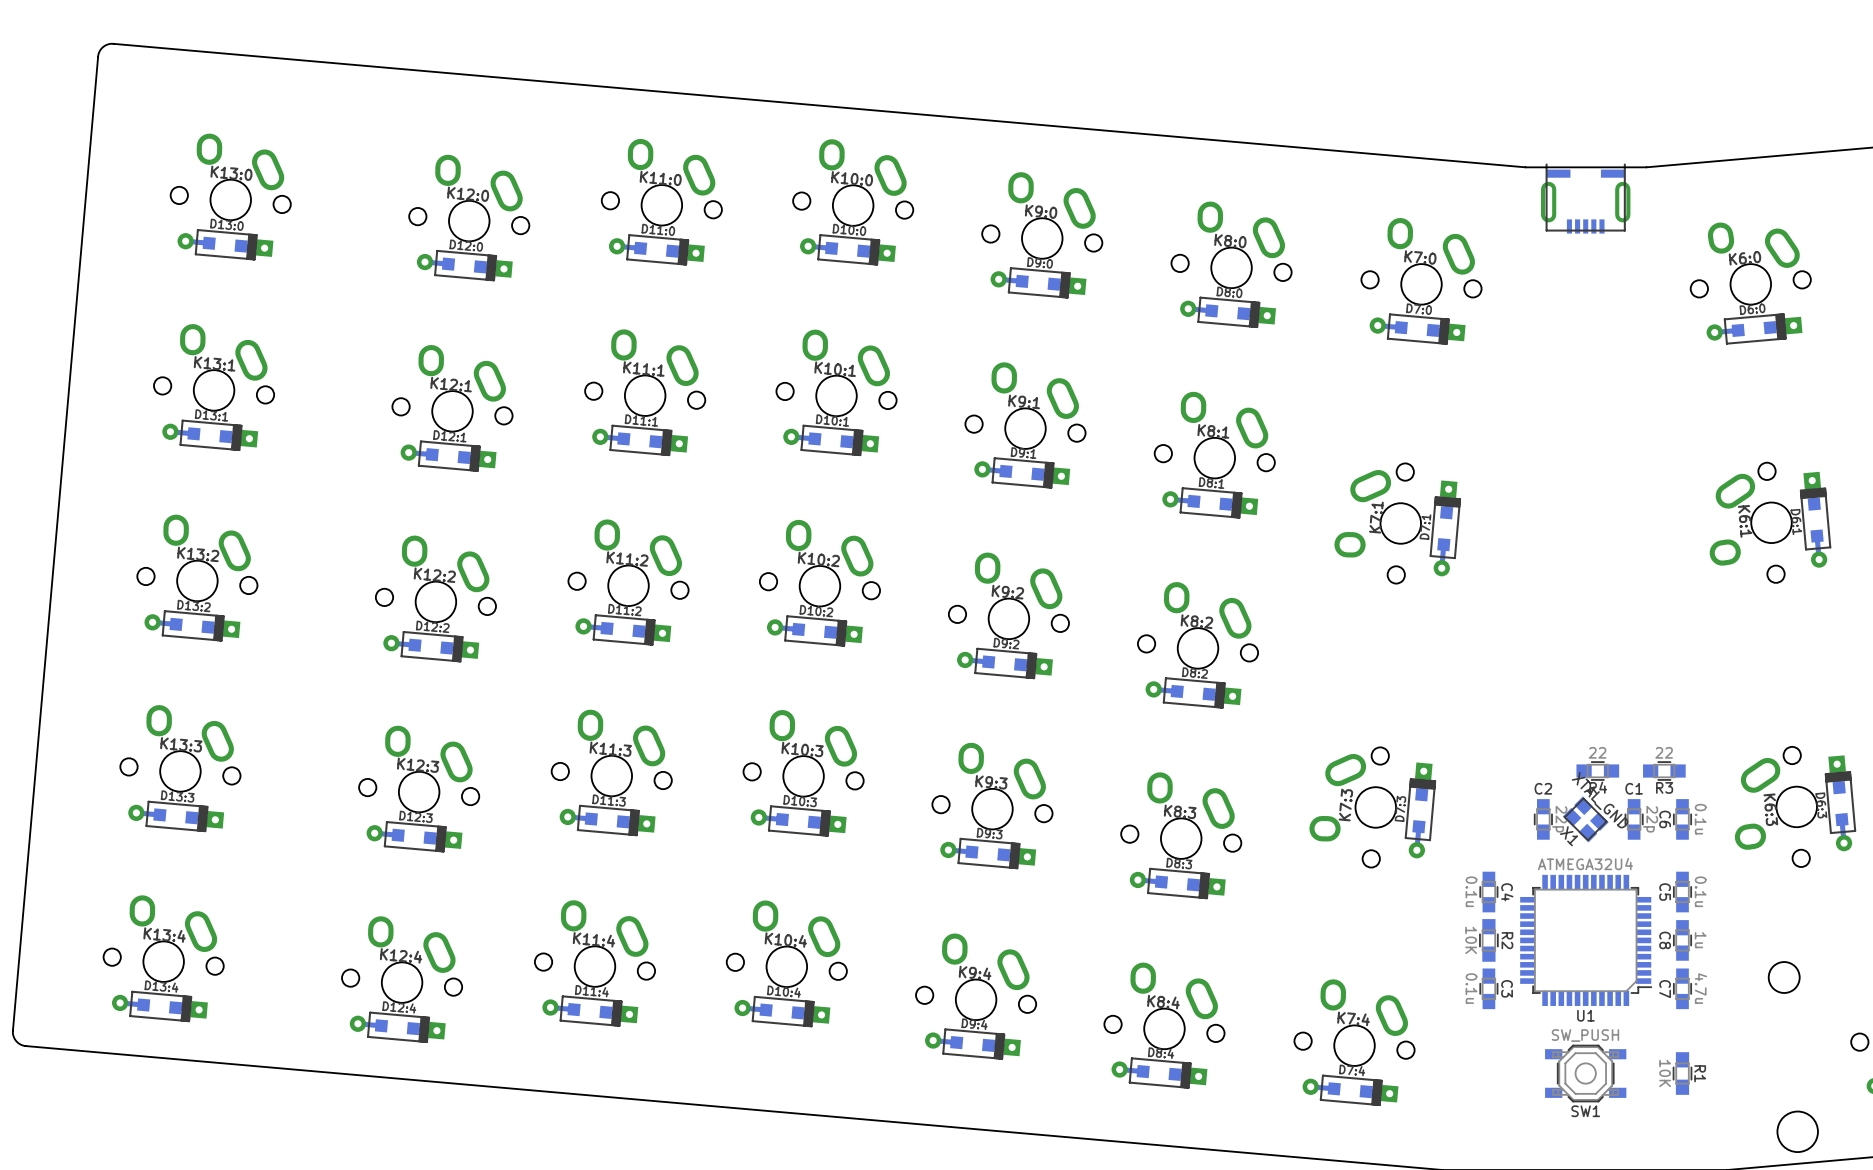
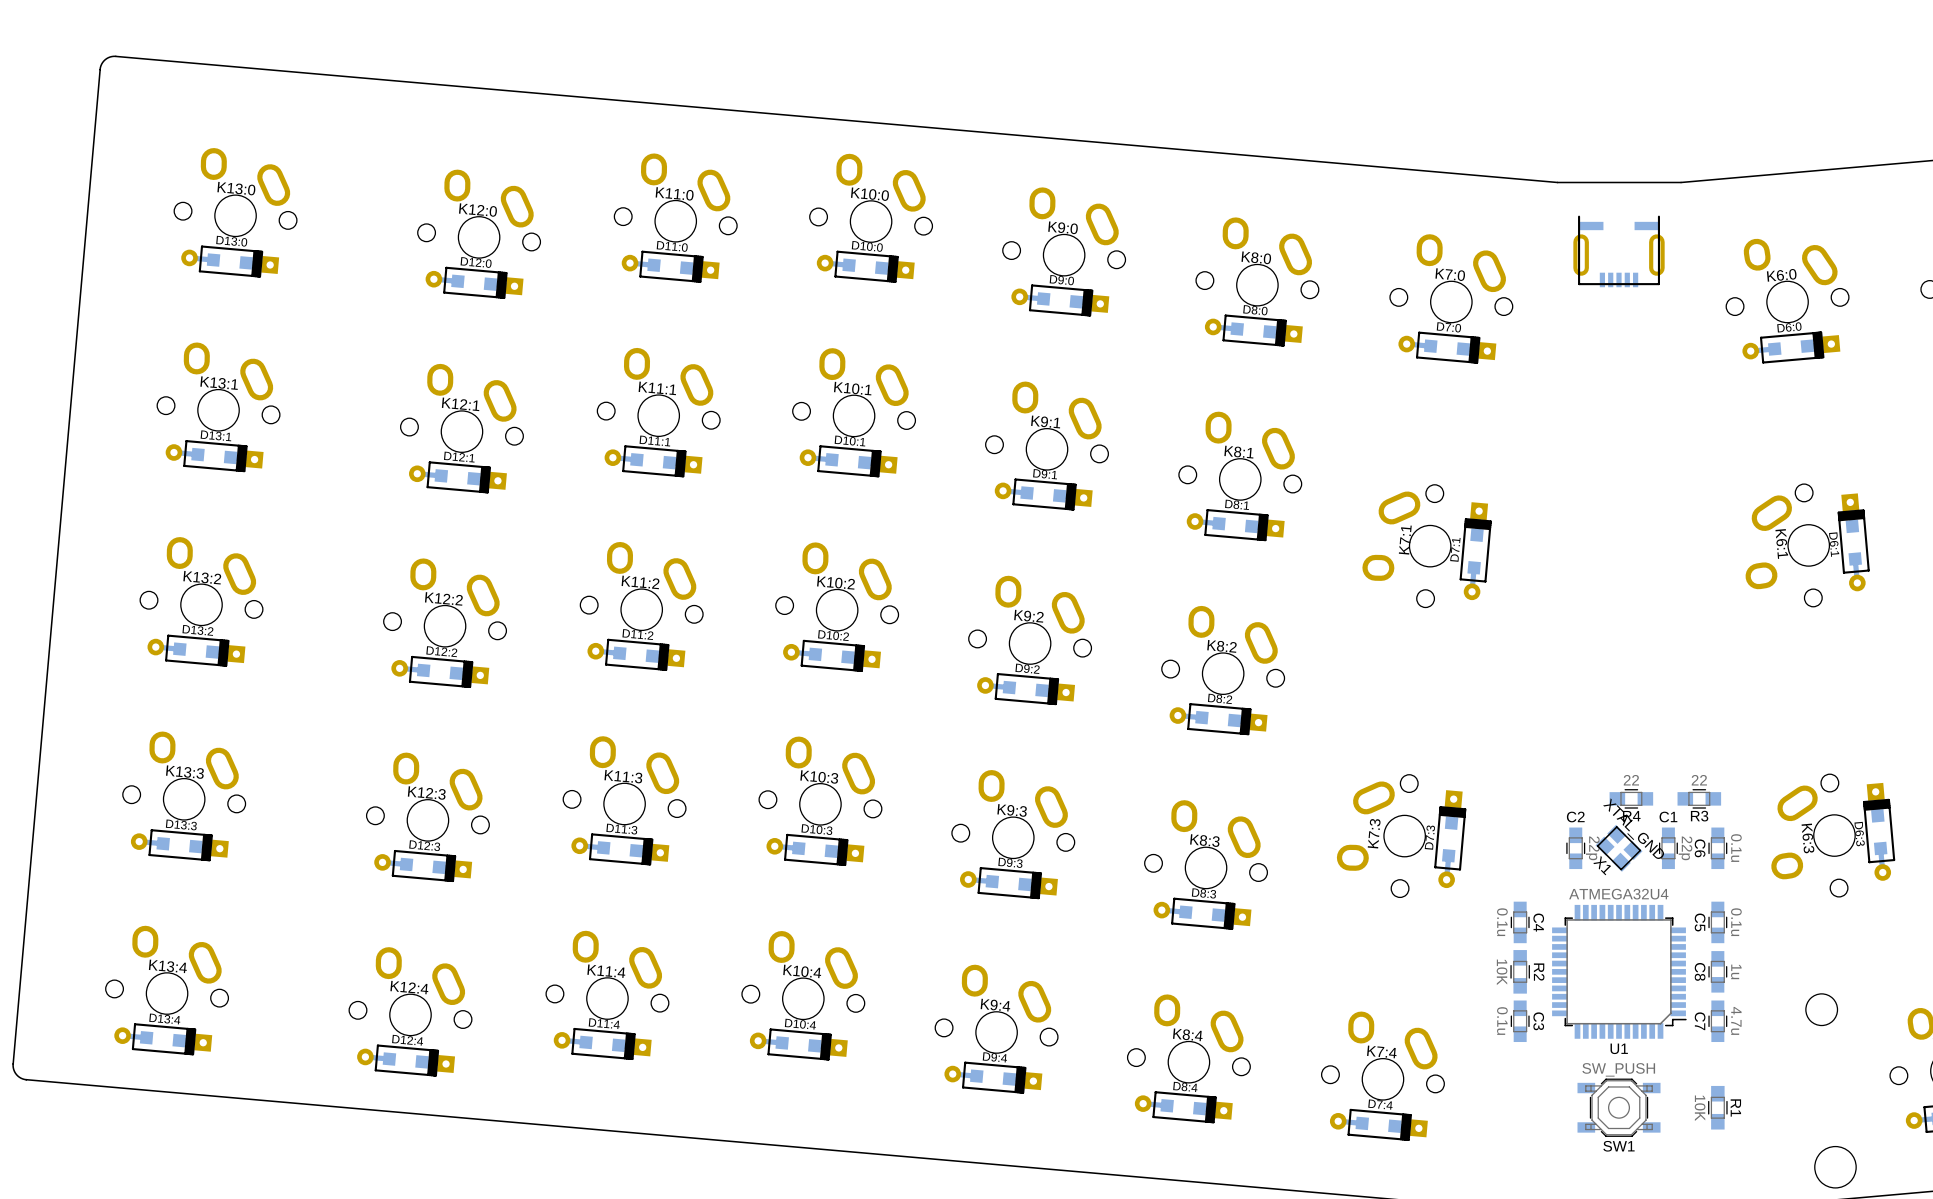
part position: (1585, 198) -> (1619, 251)

